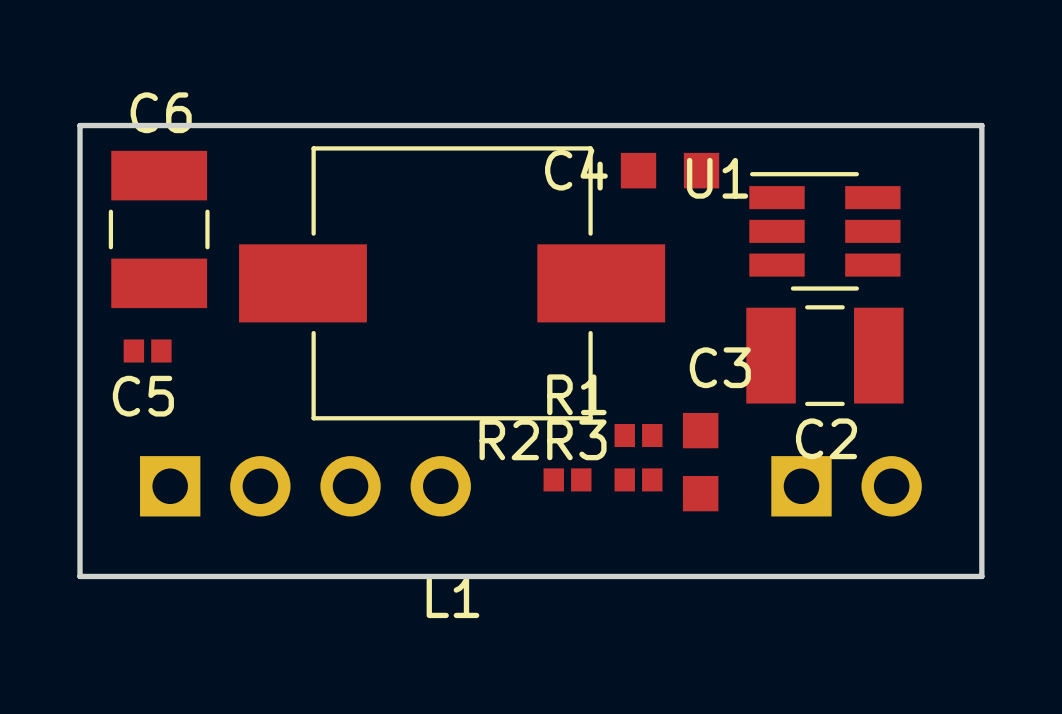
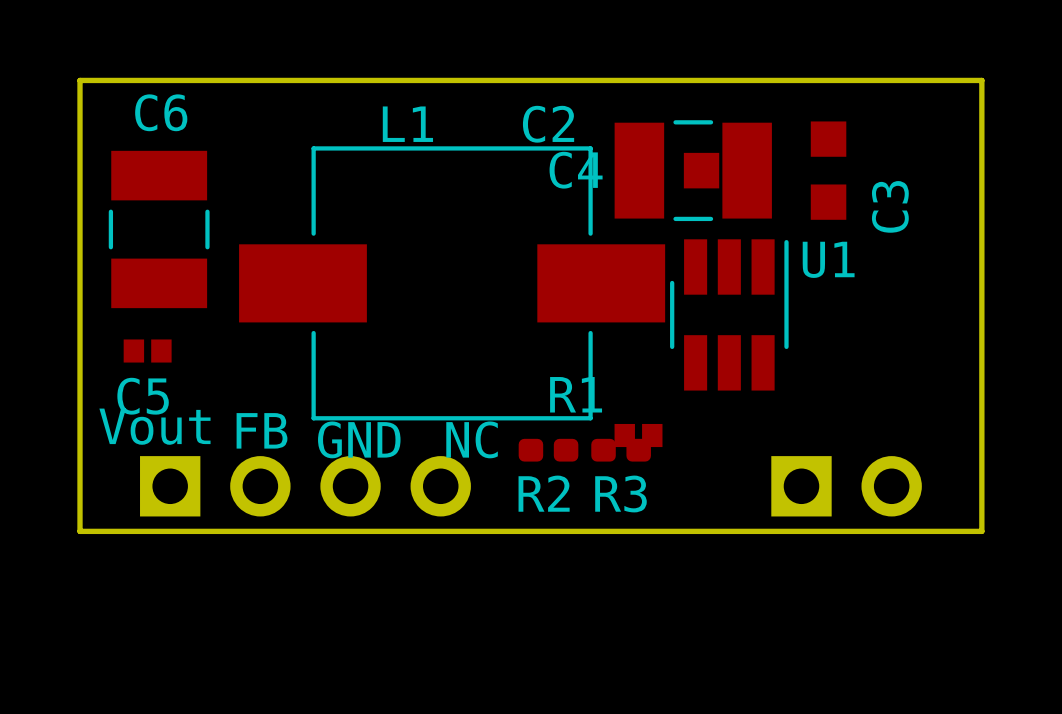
board edge: (80, 125) (981, 125) -> (80, 125) (80, 80) (981, 80) (981, 125)
U1 name position: U1 (717, 178) -> U1 (828, 259)
U1 rotation: 0° (824, 231) -> 90° clockwise (729, 314)
U1 position: (824, 231) -> (729, 314)
C2 position: (824, 355) -> (693, 170)
C3 name rotation: 0° (720, 367) -> 90° counterclockwise (890, 206)
C3 name position: C3 (720, 367) -> C3 (890, 206)
text: none -> Vout (154, 426)
text: none -> FB (262, 430)
C2 name position: C2 (826, 438) -> C2 (548, 124)
text: none -> GND (359, 439)
text: none -> NC (472, 439)
R2 name position: R2 (509, 439) -> R2 (544, 493)
R3 name position: R3 (576, 439) -> R3 (620, 494)
C3 position: (700, 462) -> (828, 170)
R2 footprint: [543, 468, 592, 492] -> [518, 438, 579, 462]
R3 footprint: [614, 468, 663, 492] -> [591, 438, 651, 462]
board edge: (80, 531) (80, 576) (981, 576) (981, 531) -> (80, 531) (981, 531)
L1 name position: L1 (452, 597) -> L1 (407, 124)

